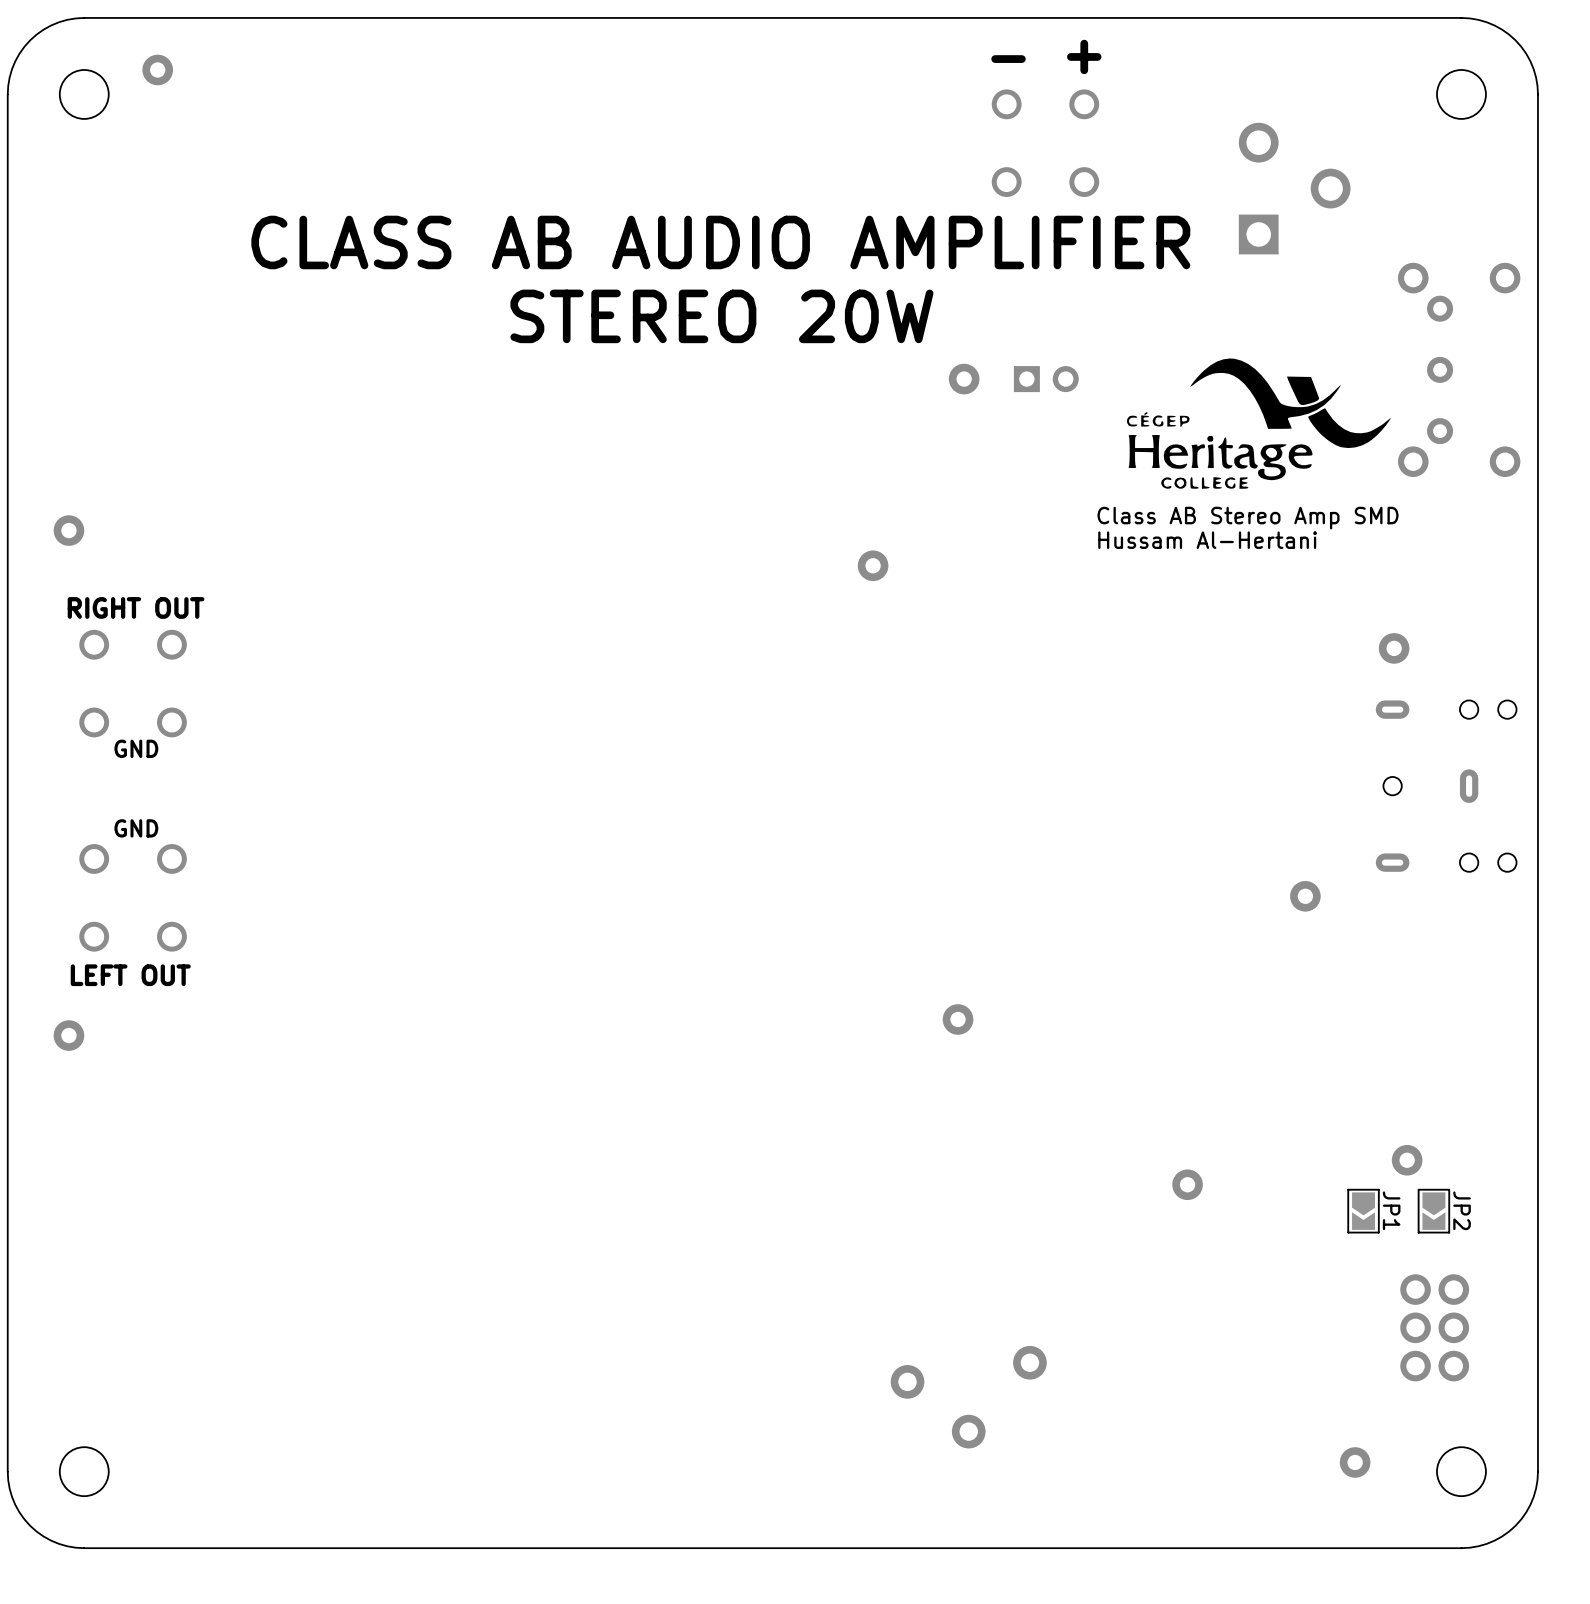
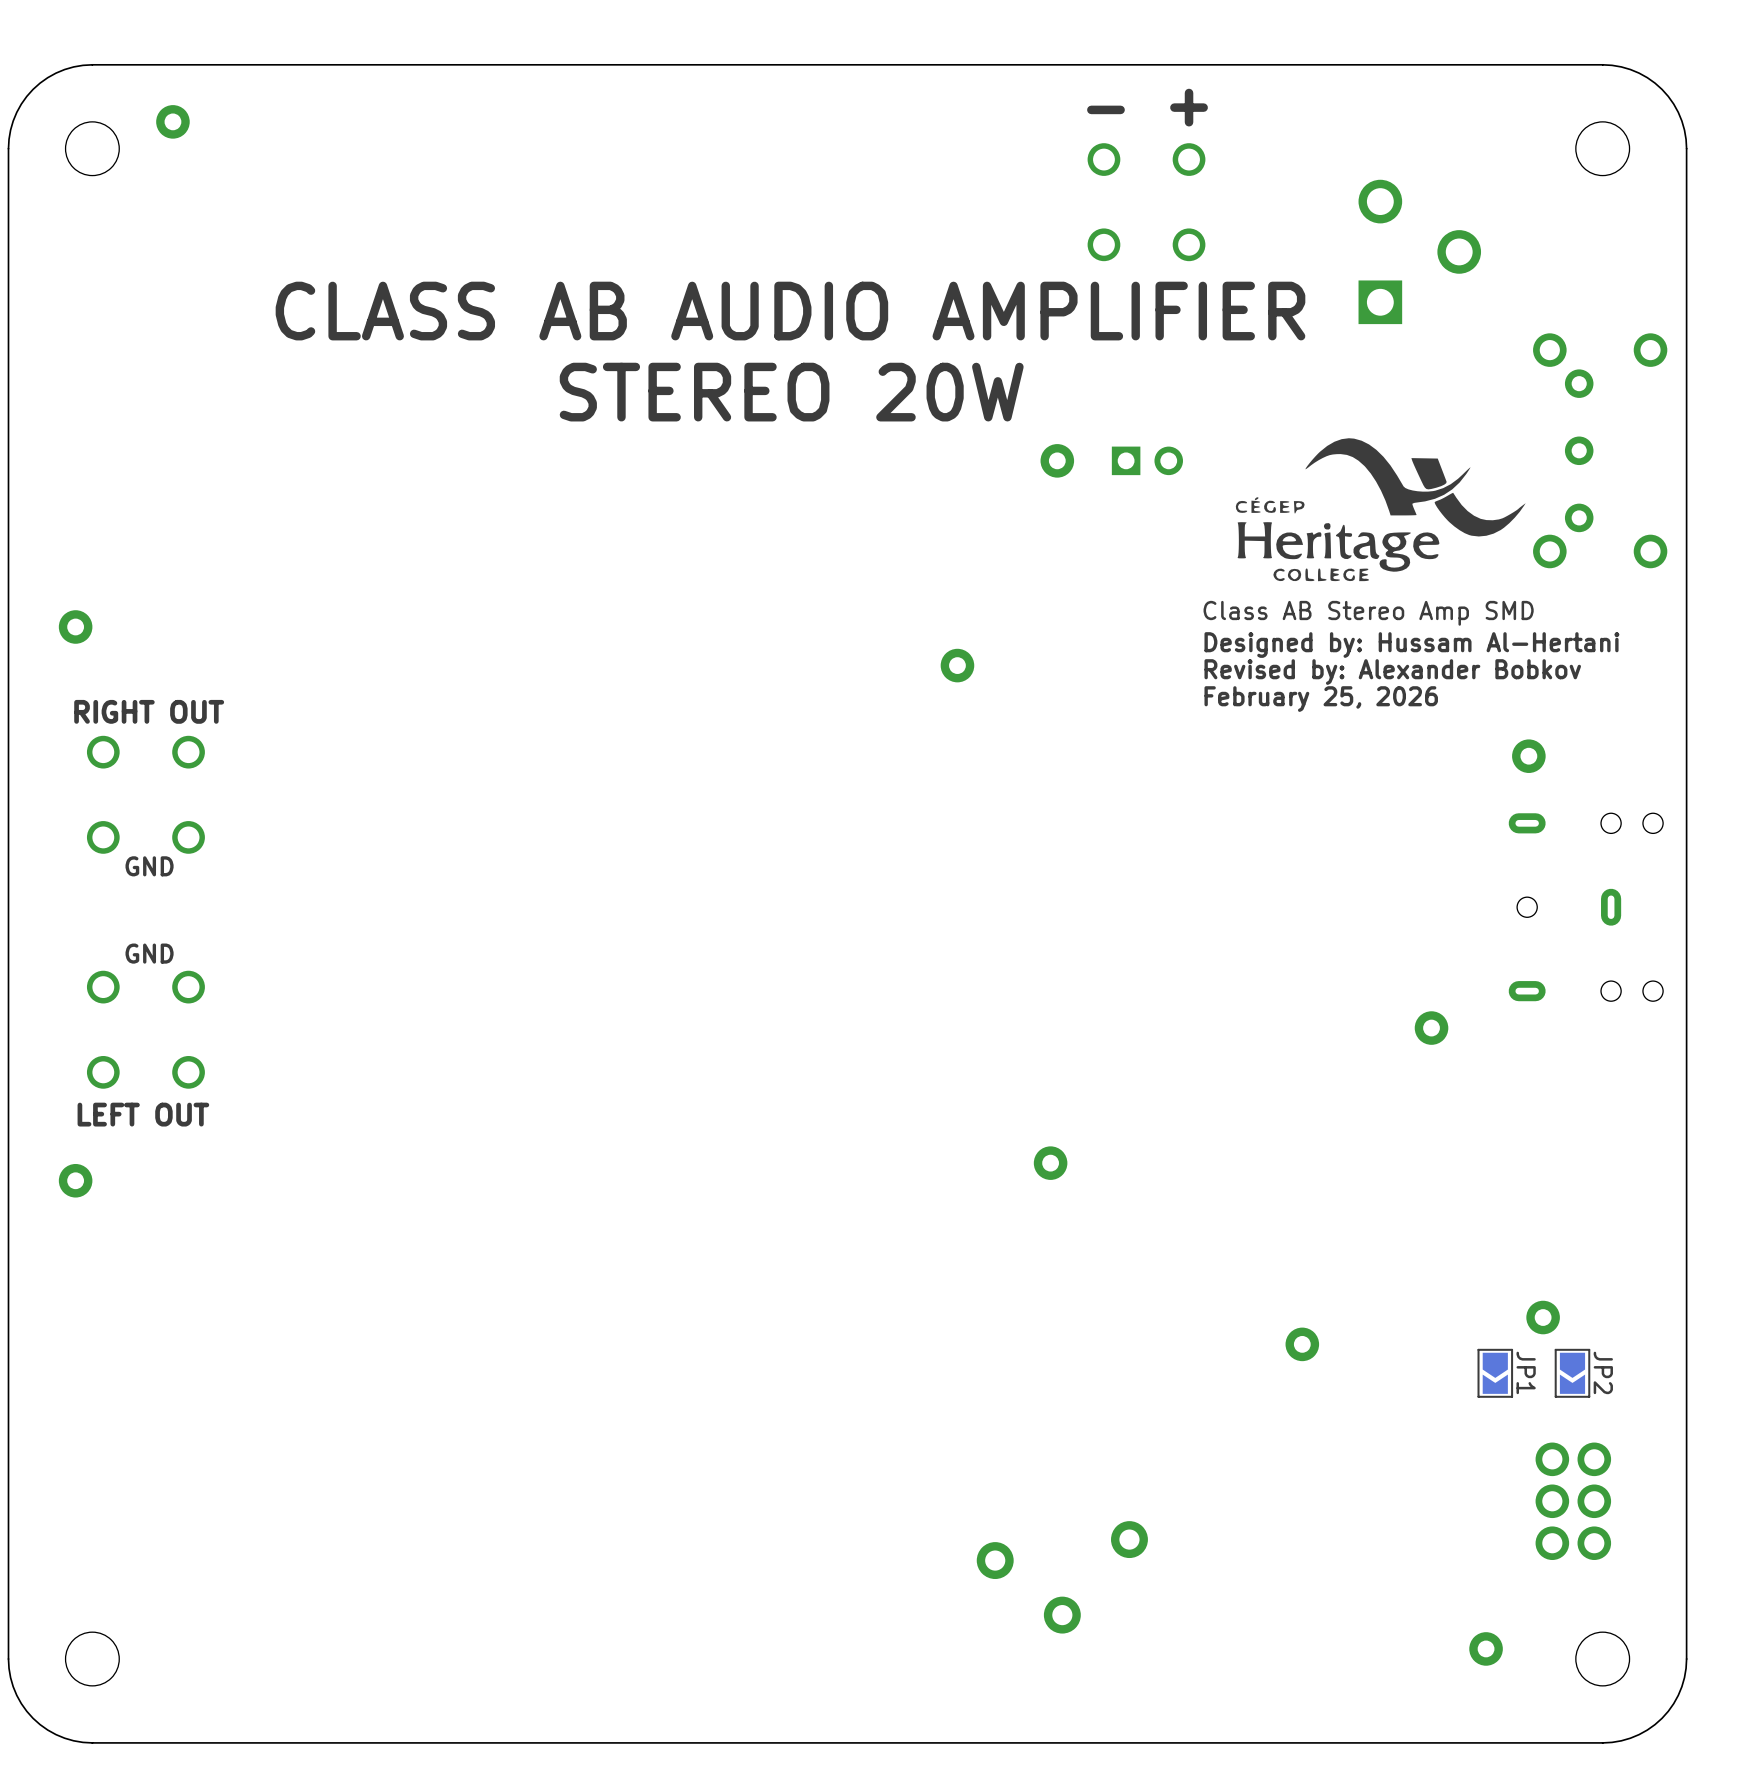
text: Hussam Al-Hertani (1207, 540) -> Designed by: Hussam Al-Hertani (1411, 645)
text: none -> Revised by: Alexander Bobkov (1392, 672)
text: none -> February 25, 2026 (1321, 699)

